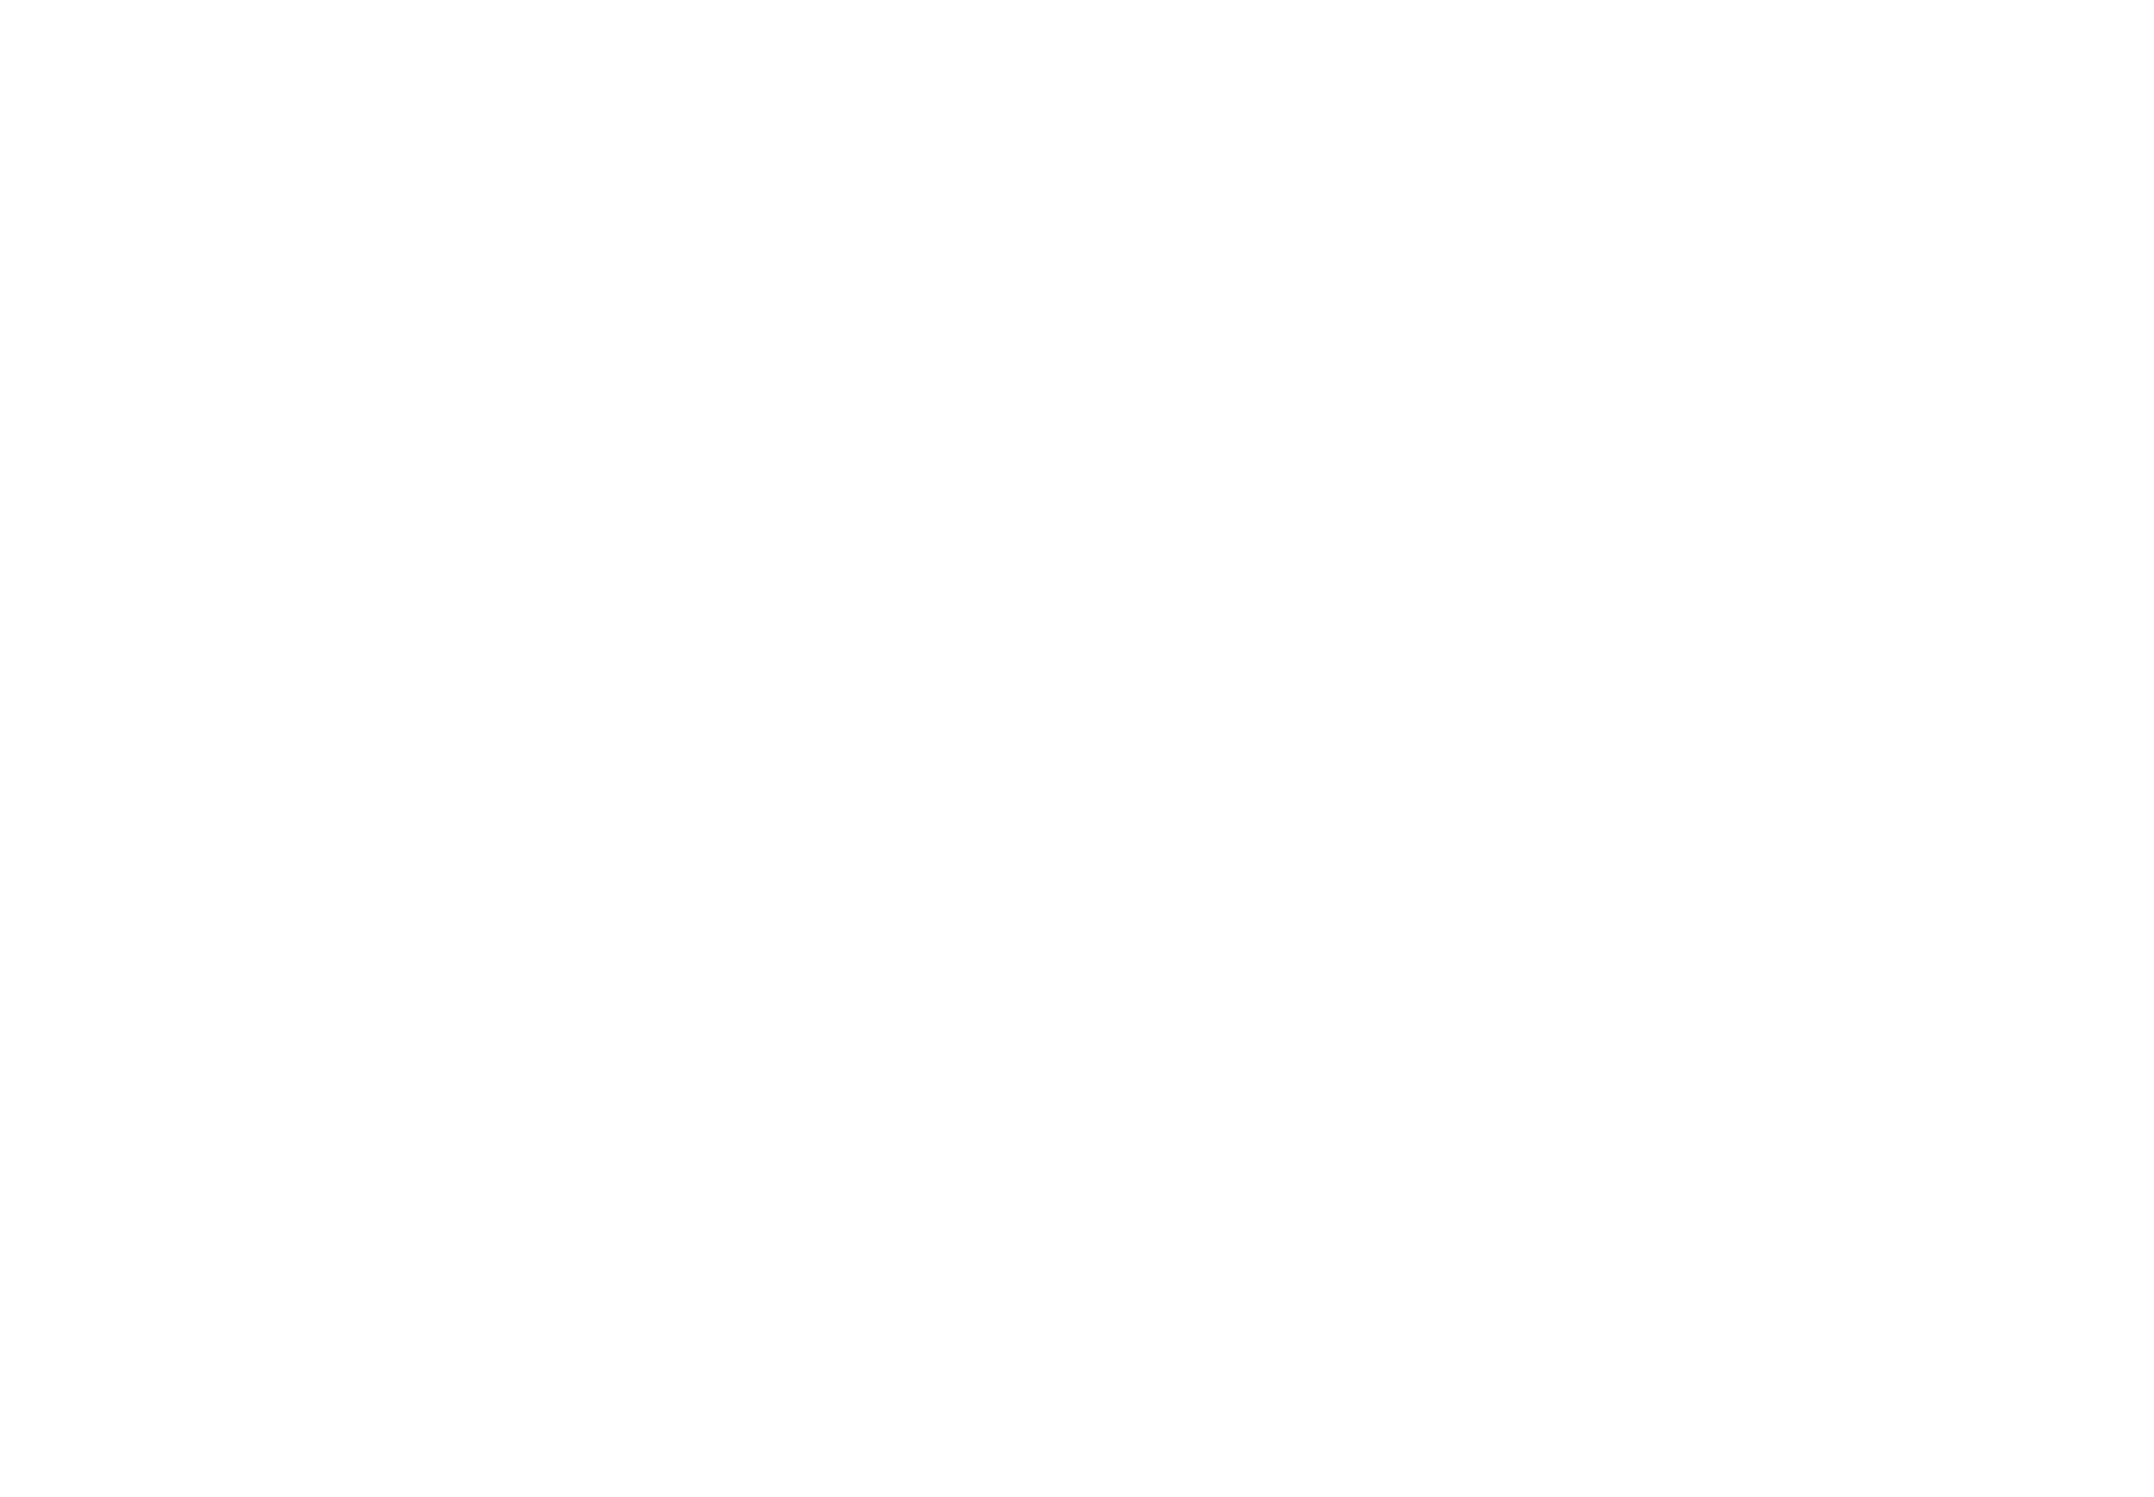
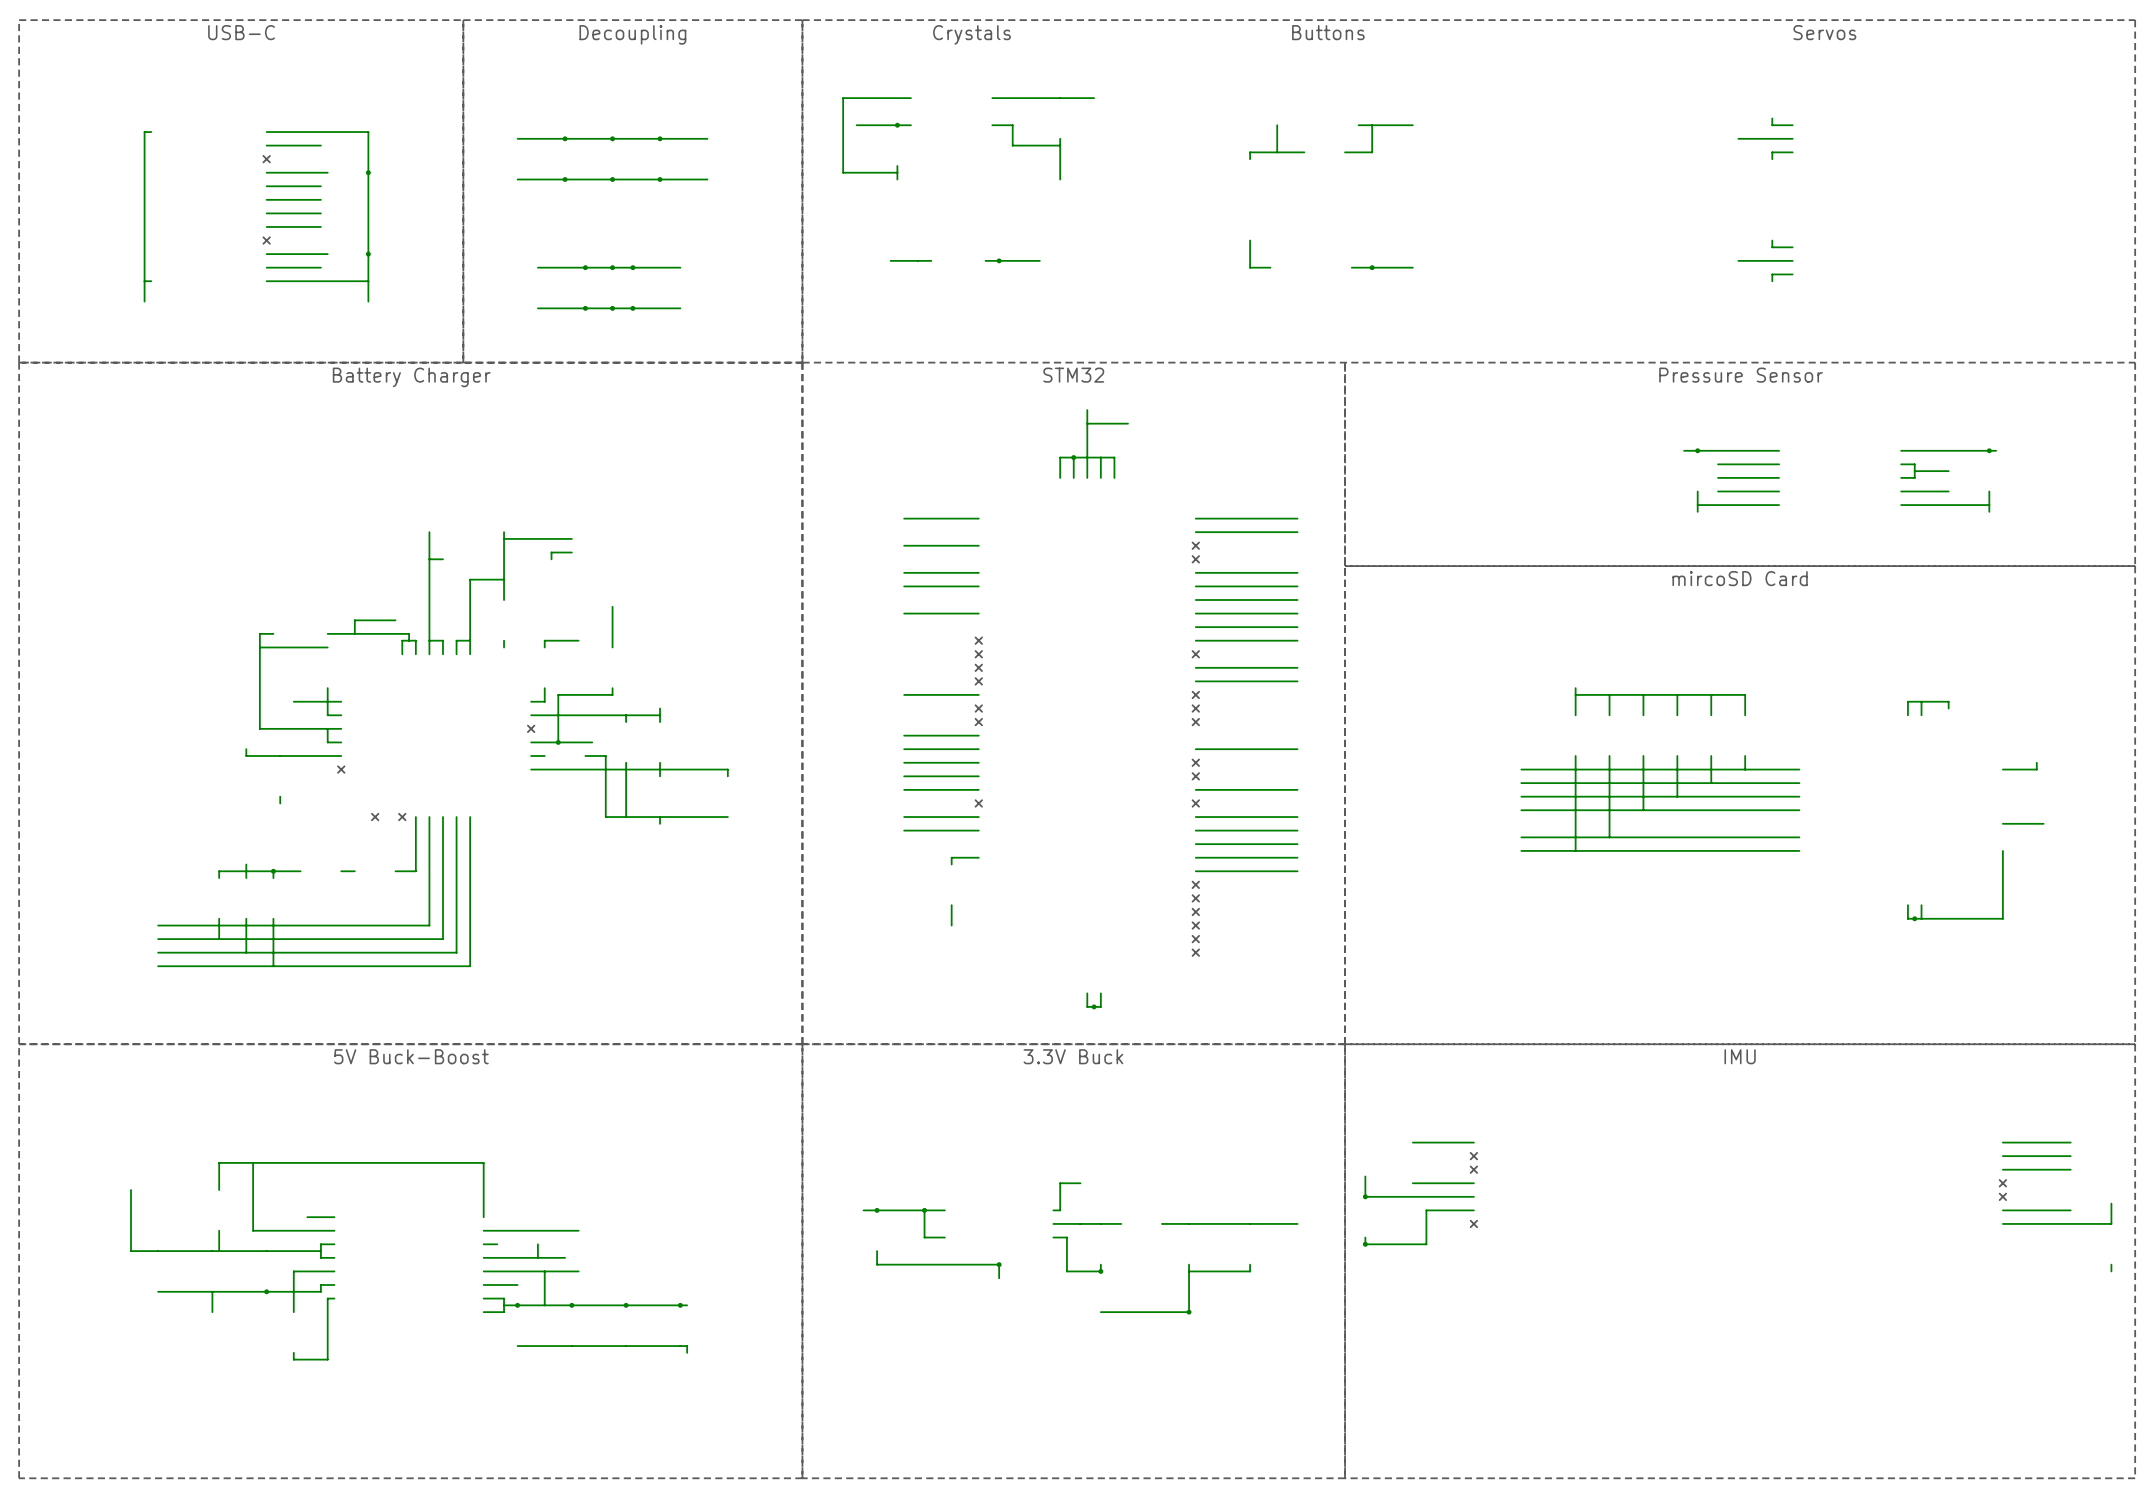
line: none -> (19, 20) (2135, 20) (2135, 1478) (19, 1478) (19, 20)
line: none -> (463, 20) (463, 362)
line: none -> (802, 20) (802, 1478)
text: none -> USB-C (241, 32)
text: none -> Buttons (1328, 32)
text: none -> Servos (1824, 32)
text: none -> Decoupling (632, 34)
text: none -> Crystals (972, 34)
wire: none -> (910, 98) (843, 98) (843, 172) (897, 172)
wire: none -> (992, 98) (1094, 98)
wire: none -> (1772, 118) (1772, 125) (1792, 125)
wire: none -> (856, 125) (910, 125)
junction: none -> (897, 125)
wire: none -> (992, 125) (1012, 125) (1012, 145) (1060, 145)
wire: none -> (1277, 125) (1277, 152)
wire: none -> (1358, 125) (1412, 125)
wire: none -> (1372, 125) (1372, 152) (1345, 152)
wire: none -> (151, 132) (144, 132) (144, 301)
wire: none -> (266, 132) (368, 132) (368, 301)
wire: none -> (517, 138) (707, 138)
junction: none -> (565, 138)
junction: none -> (612, 138)
junction: none -> (660, 138)
wire: none -> (1060, 138) (1060, 179)
wire: none -> (1738, 138) (1792, 138)
wire: none -> (266, 145) (320, 145)
wire: none -> (1304, 152) (1250, 152) (1250, 159)
wire: none -> (1792, 152) (1772, 152) (1772, 159)
no-connect mark: none -> (266, 159)
wire: none -> (897, 165) (897, 179)
wire: none -> (266, 172) (327, 172)
junction: none -> (368, 172)
wire: none -> (517, 179) (707, 179)
junction: none -> (565, 179)
junction: none -> (612, 179)
junction: none -> (660, 179)
wire: none -> (266, 186) (320, 186)
wire: none -> (266, 199) (320, 199)
wire: none -> (266, 213) (320, 213)
wire: none -> (266, 226) (320, 226)
no-connect mark: none -> (266, 240)
wire: none -> (1250, 240) (1250, 267) (1270, 267)
wire: none -> (1772, 240) (1772, 247) (1792, 247)
wire: none -> (266, 254) (327, 254)
junction: none -> (368, 254)
wire: none -> (890, 260) (931, 260)
wire: none -> (985, 260) (1039, 260)
junction: none -> (999, 260)
wire: none -> (1738, 260) (1792, 260)
wire: none -> (266, 267) (320, 267)
wire: none -> (537, 267) (680, 267)
junction: none -> (585, 267)
junction: none -> (612, 267)
junction: none -> (632, 267)
wire: none -> (1351, 267) (1412, 267)
junction: none -> (1372, 267)
wire: none -> (1792, 274) (1772, 274) (1772, 281)
wire: none -> (144, 281) (151, 281)
wire: none -> (266, 281) (368, 281)
wire: none -> (537, 308) (680, 308)
junction: none -> (585, 308)
junction: none -> (612, 308)
junction: none -> (632, 308)
line: none -> (19, 362) (2135, 362)
line: none -> (1345, 362) (1345, 1478)
text: none -> STM32 (1073, 375)
text: none -> Pressure Sensor (1741, 375)
text: none -> Battery Charger (411, 377)
wire: none -> (1087, 410) (1087, 477)
wire: none -> (1087, 423) (1127, 423)
wire: none -> (1684, 450) (1779, 450)
junction: none -> (1697, 450)
wire: none -> (1901, 450) (1996, 450)
junction: none -> (1989, 450)
wire: none -> (1073, 457) (1073, 477)
junction: none -> (1073, 457)
wire: none -> (1100, 457) (1100, 477)
wire: none -> (1718, 464) (1779, 464)
wire: none -> (1901, 464) (1914, 464) (1914, 477) (1901, 477)
wire: none -> (1914, 471) (1948, 471)
wire: none -> (1060, 477) (1060, 457) (1114, 457) (1114, 477)
wire: none -> (1718, 477) (1779, 477)
wire: none -> (1697, 491) (1697, 511)
wire: none -> (1718, 491) (1779, 491)
wire: none -> (1901, 491) (1948, 491)
wire: none -> (1989, 491) (1989, 511)
wire: none -> (1697, 505) (1779, 505)
wire: none -> (1901, 505) (1989, 505)
wire: none -> (904, 518) (978, 518)
wire: none -> (1195, 518) (1297, 518)
wire: none -> (429, 532) (429, 654)
wire: none -> (504, 532) (504, 600)
wire: none -> (1195, 532) (1297, 532)
wire: none -> (504, 538) (571, 538)
wire: none -> (904, 545) (978, 545)
no-connect mark: none -> (1195, 545)
wire: none -> (571, 552) (551, 552) (551, 559)
wire: none -> (429, 559) (442, 559)
no-connect mark: none -> (1195, 559)
line: none -> (1345, 566) (2135, 566)
wire: none -> (904, 572) (978, 572)
wire: none -> (1195, 572) (1297, 572)
text: none -> mircoSD Card (1740, 578)
wire: none -> (504, 579) (470, 579) (470, 654)
wire: none -> (904, 586) (978, 586)
wire: none -> (1195, 586) (1297, 586)
wire: none -> (1195, 600) (1297, 600)
wire: none -> (612, 606) (612, 647)
wire: none -> (904, 613) (978, 613)
wire: none -> (1195, 613) (1297, 613)
wire: none -> (395, 620) (354, 620) (354, 633)
wire: none -> (1195, 627) (1297, 627)
wire: none -> (273, 633) (259, 633) (259, 728) (341, 728)
wire: none -> (327, 633) (409, 633) (409, 640)
wire: none -> (429, 640) (442, 640) (442, 654)
wire: none -> (470, 640) (456, 640) (456, 654)
wire: none -> (504, 640) (504, 647)
wire: none -> (578, 640) (544, 640) (544, 647)
no-connect mark: none -> (978, 640)
wire: none -> (1195, 640) (1297, 640)
wire: none -> (259, 647) (327, 647)
wire: none -> (402, 654) (402, 640) (415, 640) (415, 654)
no-connect mark: none -> (978, 654)
no-connect mark: none -> (1195, 654)
no-connect mark: none -> (978, 667)
wire: none -> (1195, 667) (1297, 667)
no-connect mark: none -> (978, 681)
wire: none -> (1195, 681) (1297, 681)
wire: none -> (327, 688) (327, 715) (341, 715)
wire: none -> (544, 688) (544, 701) (531, 701)
wire: none -> (612, 688) (612, 694) (558, 694) (558, 742)
wire: none -> (1575, 688) (1575, 715)
wire: none -> (904, 694) (978, 694)
no-connect mark: none -> (1195, 694)
wire: none -> (1575, 694) (1745, 694) (1745, 715)
wire: none -> (1609, 694) (1609, 715)
wire: none -> (1643, 694) (1643, 715)
wire: none -> (1677, 694) (1677, 715)
wire: none -> (1711, 694) (1711, 715)
wire: none -> (293, 701) (341, 701)
wire: none -> (1921, 701) (1921, 715)
wire: none -> (660, 708) (660, 722)
no-connect mark: none -> (978, 708)
no-connect mark: none -> (1195, 708)
wire: none -> (1948, 708) (1948, 701) (1907, 701) (1907, 715)
wire: none -> (531, 715) (660, 715)
wire: none -> (626, 715) (626, 722)
no-connect mark: none -> (978, 722)
no-connect mark: none -> (1195, 722)
wire: none -> (327, 728) (327, 742) (341, 742)
no-connect mark: none -> (531, 728)
wire: none -> (904, 735) (978, 735)
wire: none -> (531, 742) (592, 742)
junction: none -> (558, 742)
wire: none -> (246, 749) (246, 755) (341, 755)
wire: none -> (904, 749) (978, 749)
wire: none -> (1195, 749) (1297, 749)
wire: none -> (531, 755) (544, 755)
wire: none -> (585, 755) (605, 755) (605, 817) (727, 817)
wire: none -> (1575, 755) (1575, 850)
wire: none -> (1609, 755) (1609, 837)
wire: none -> (1643, 755) (1643, 810)
wire: none -> (1677, 755) (1677, 796)
wire: none -> (1711, 755) (1711, 783)
wire: none -> (1745, 755) (1745, 769)
wire: none -> (626, 762) (626, 817)
wire: none -> (660, 762) (660, 776)
wire: none -> (904, 762) (978, 762)
no-connect mark: none -> (1195, 762)
wire: none -> (2036, 762) (2036, 769) (2002, 769)
no-connect mark: none -> (341, 769)
wire: none -> (531, 769) (727, 769) (727, 776)
wire: none -> (1521, 769) (1799, 769)
wire: none -> (904, 776) (978, 776)
no-connect mark: none -> (1195, 776)
wire: none -> (1521, 783) (1799, 783)
wire: none -> (904, 789) (978, 789)
wire: none -> (1195, 789) (1297, 789)
wire: none -> (280, 796) (280, 803)
wire: none -> (1521, 796) (1799, 796)
no-connect mark: none -> (978, 803)
no-connect mark: none -> (1195, 803)
wire: none -> (1521, 810) (1799, 810)
no-connect mark: none -> (375, 817)
no-connect mark: none -> (402, 817)
wire: none -> (415, 817) (415, 871) (395, 871)
wire: none -> (429, 817) (429, 925) (158, 925)
wire: none -> (442, 817) (442, 939) (158, 939)
wire: none -> (456, 817) (456, 952) (158, 952)
wire: none -> (470, 817) (470, 966) (158, 966)
wire: none -> (660, 817) (660, 823)
wire: none -> (904, 817) (978, 817)
wire: none -> (1195, 817) (1297, 817)
wire: none -> (2002, 823) (2043, 823)
wire: none -> (904, 830) (978, 830)
wire: none -> (1195, 830) (1297, 830)
wire: none -> (1521, 837) (1799, 837)
wire: none -> (1195, 844) (1297, 844)
wire: none -> (1521, 850) (1799, 850)
wire: none -> (2002, 850) (2002, 918) (1907, 918) (1907, 905)
wire: none -> (978, 857) (951, 857) (951, 864)
wire: none -> (1195, 857) (1297, 857)
wire: none -> (246, 864) (246, 878)
wire: none -> (273, 871) (273, 878)
junction: none -> (273, 871)
wire: none -> (300, 871) (219, 871) (219, 878)
wire: none -> (341, 871) (354, 871)
wire: none -> (1195, 871) (1297, 871)
no-connect mark: none -> (1195, 884)
no-connect mark: none -> (1195, 898)
wire: none -> (951, 905) (951, 925)
wire: none -> (1921, 905) (1921, 918)
no-connect mark: none -> (1195, 911)
wire: none -> (219, 918) (219, 939)
wire: none -> (246, 918) (246, 952)
wire: none -> (273, 918) (273, 966)
junction: none -> (1914, 918)
no-connect mark: none -> (1195, 925)
no-connect mark: none -> (1195, 939)
no-connect mark: none -> (1195, 952)
wire: none -> (1087, 993) (1087, 1006) (1100, 1006) (1100, 993)
junction: none -> (1094, 1006)
line: none -> (19, 1044) (2135, 1044)
line: none -> (1345, 1044) (2135, 1044)
text: none -> 5V Buck-Boost (411, 1056)
text: none -> 3.3V Buck (1073, 1056)
text: none -> IMU (1740, 1056)
wire: none -> (1412, 1142) (1473, 1142)
wire: none -> (2002, 1142) (2070, 1142)
no-connect mark: none -> (1473, 1156)
wire: none -> (2002, 1156) (2070, 1156)
wire: none -> (253, 1162) (253, 1230) (334, 1230)
no-connect mark: none -> (1473, 1169)
wire: none -> (2002, 1169) (2070, 1169)
wire: none -> (1365, 1176) (1365, 1196) (1473, 1196)
wire: none -> (1080, 1183) (1060, 1183) (1060, 1210) (1053, 1210)
wire: none -> (1412, 1183) (1473, 1183)
no-connect mark: none -> (2002, 1183)
wire: none -> (131, 1190) (131, 1251) (320, 1251)
wire: none -> (219, 1190) (219, 1162) (483, 1162) (483, 1217)
junction: none -> (1365, 1196)
no-connect mark: none -> (2002, 1196)
wire: none -> (2111, 1203) (2111, 1223) (2002, 1223)
wire: none -> (863, 1210) (944, 1210)
junction: none -> (877, 1210)
wire: none -> (924, 1210) (924, 1237) (944, 1237)
junction: none -> (924, 1210)
wire: none -> (1473, 1210) (1426, 1210) (1426, 1244) (1365, 1244) (1365, 1237)
wire: none -> (2002, 1210) (2070, 1210)
wire: none -> (307, 1217) (334, 1217)
wire: none -> (1053, 1223) (1121, 1223)
wire: none -> (1161, 1223) (1297, 1223)
no-connect mark: none -> (1473, 1223)
wire: none -> (219, 1230) (219, 1251)
wire: none -> (483, 1230) (578, 1230)
wire: none -> (1053, 1237) (1066, 1237) (1066, 1271) (1100, 1271) (1100, 1264)
wire: none -> (334, 1244) (320, 1244) (320, 1257) (334, 1257)
wire: none -> (483, 1244) (497, 1244)
wire: none -> (537, 1244) (537, 1257)
junction: none -> (1365, 1244)
wire: none -> (877, 1251) (877, 1264) (999, 1264) (999, 1278)
wire: none -> (483, 1257) (565, 1257)
junction: none -> (999, 1264)
wire: none -> (1189, 1264) (1189, 1312) (1100, 1312)
wire: none -> (1250, 1264) (1250, 1271) (1189, 1271)
wire: none -> (2111, 1264) (2111, 1271)
wire: none -> (334, 1271) (293, 1271) (293, 1312)
wire: none -> (483, 1271) (578, 1271)
wire: none -> (544, 1271) (544, 1305)
junction: none -> (1100, 1271)
wire: none -> (334, 1285) (320, 1285) (320, 1291) (158, 1291)
wire: none -> (483, 1285) (517, 1285)
wire: none -> (212, 1291) (212, 1312)
junction: none -> (266, 1291)
wire: none -> (334, 1298) (327, 1298) (327, 1359) (293, 1359) (293, 1352)
wire: none -> (483, 1298) (504, 1298) (504, 1312) (483, 1312)
wire: none -> (504, 1305) (687, 1305)
junction: none -> (517, 1305)
junction: none -> (571, 1305)
junction: none -> (626, 1305)
junction: none -> (680, 1305)
junction: none -> (1189, 1312)
wire: none -> (517, 1346) (687, 1346) (687, 1352)

